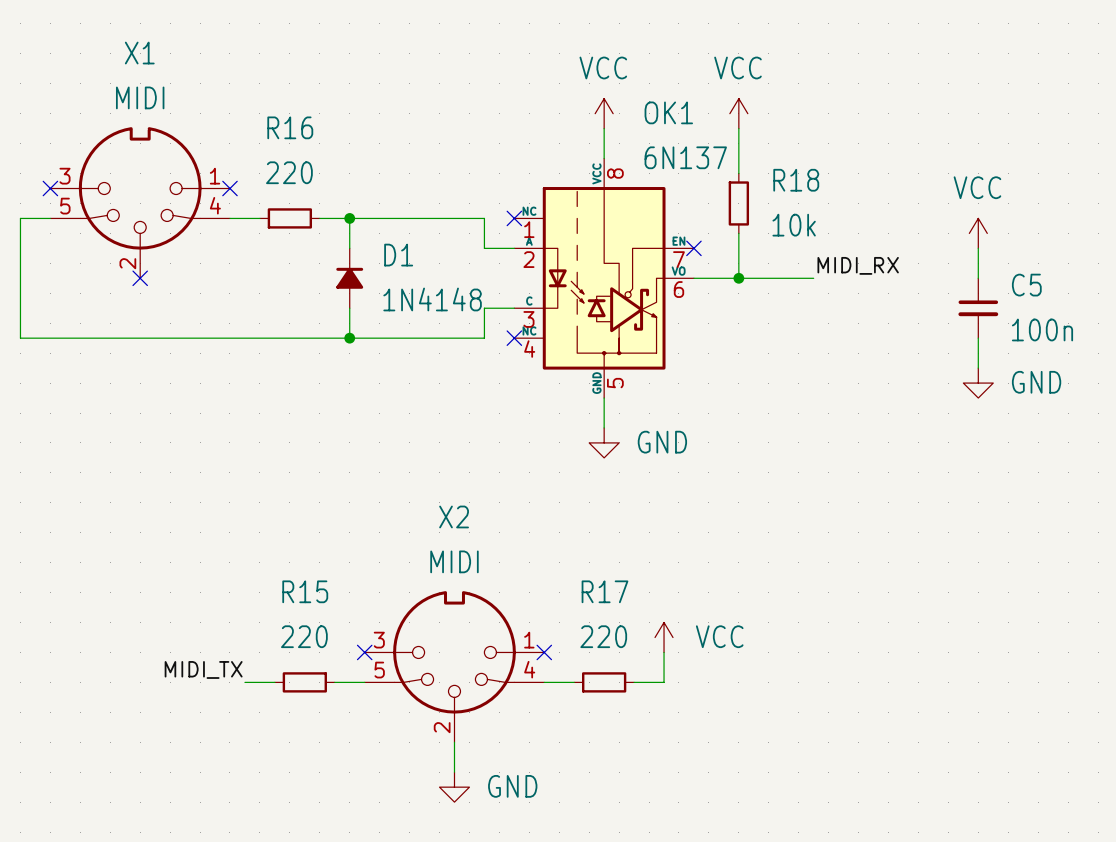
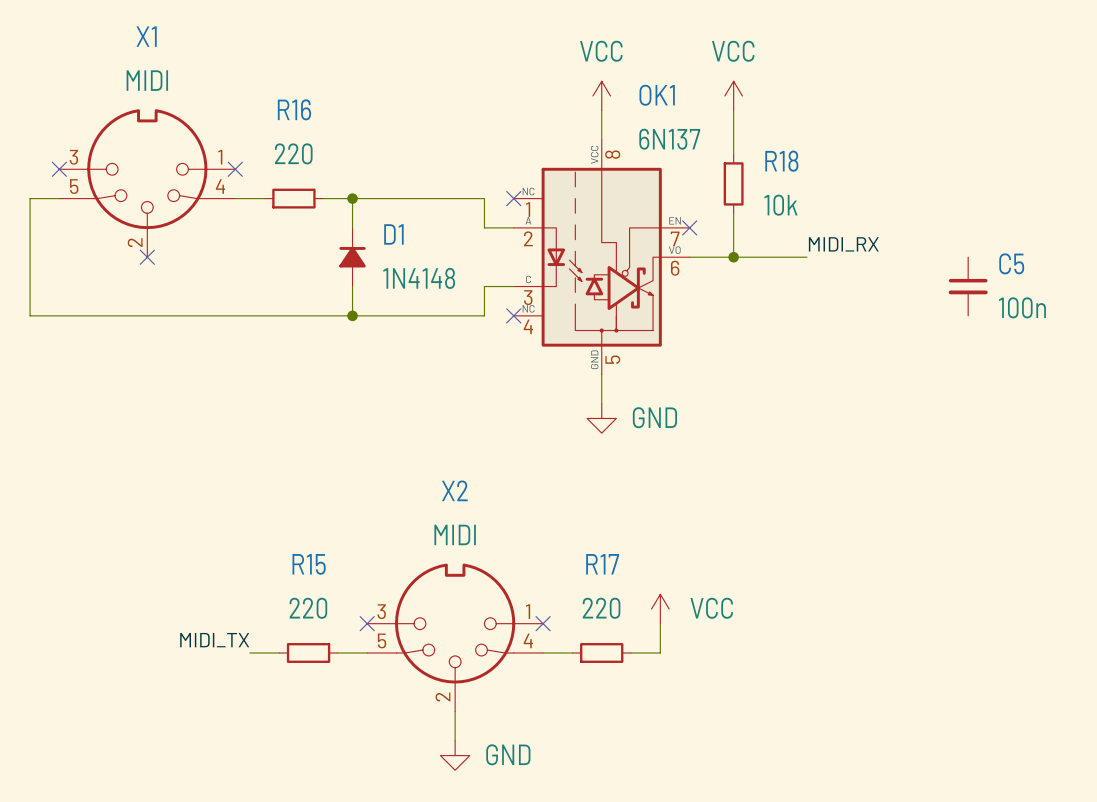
power symbol: VCC (978, 233) -> none
wire: (978, 248) (978, 278) -> none
wire: (978, 338) (978, 368) -> none
power symbol: GND (978, 383) -> none

